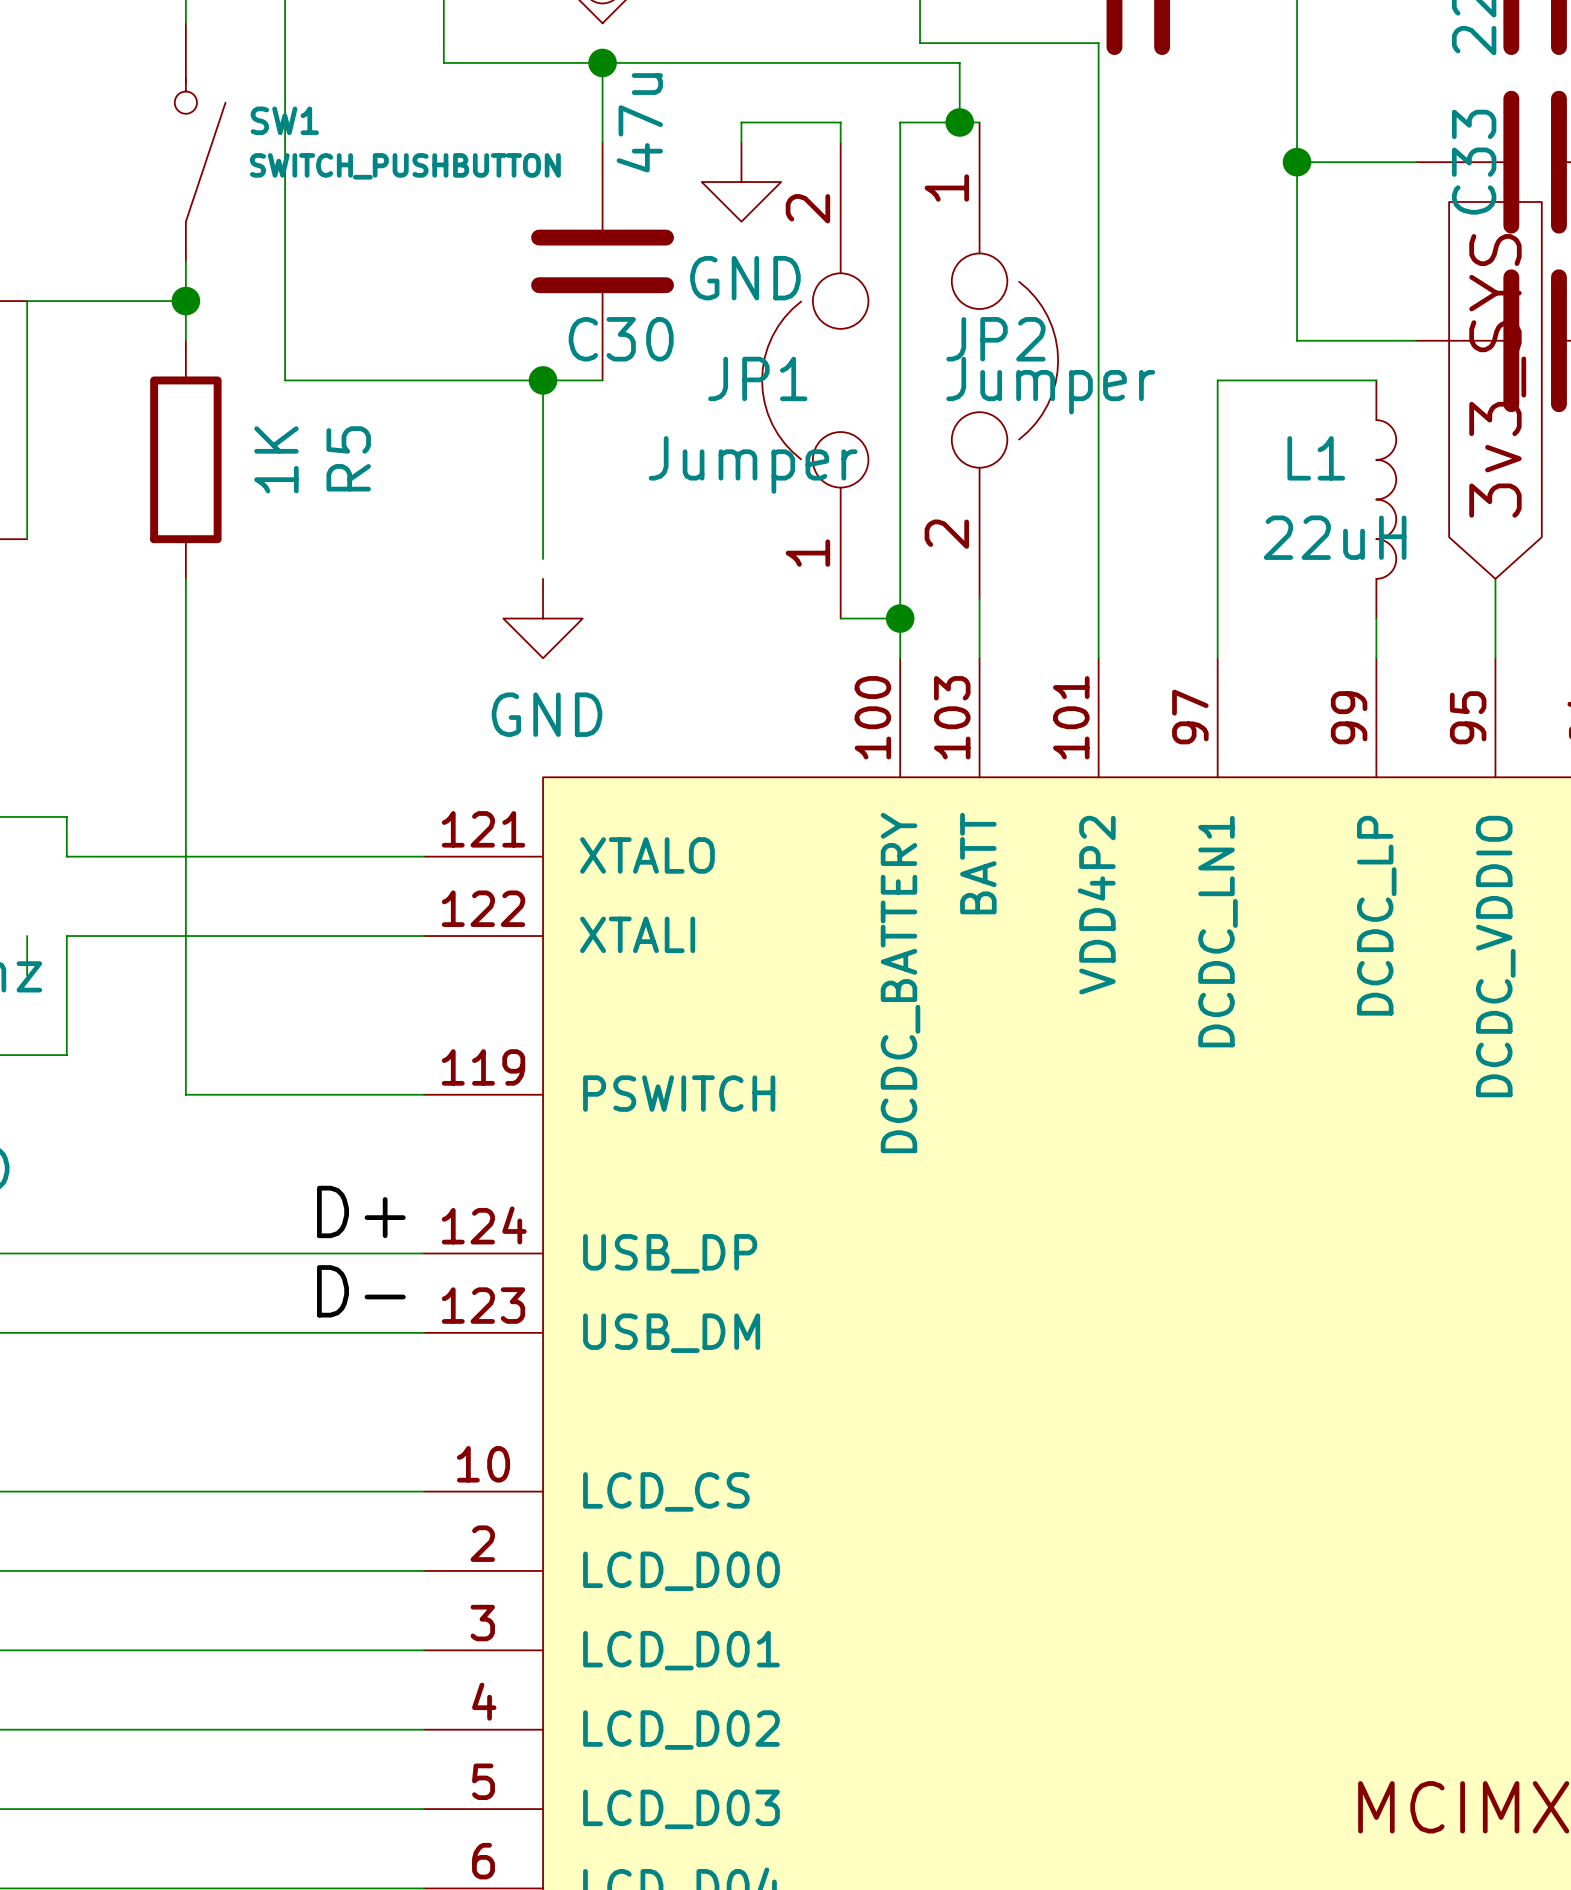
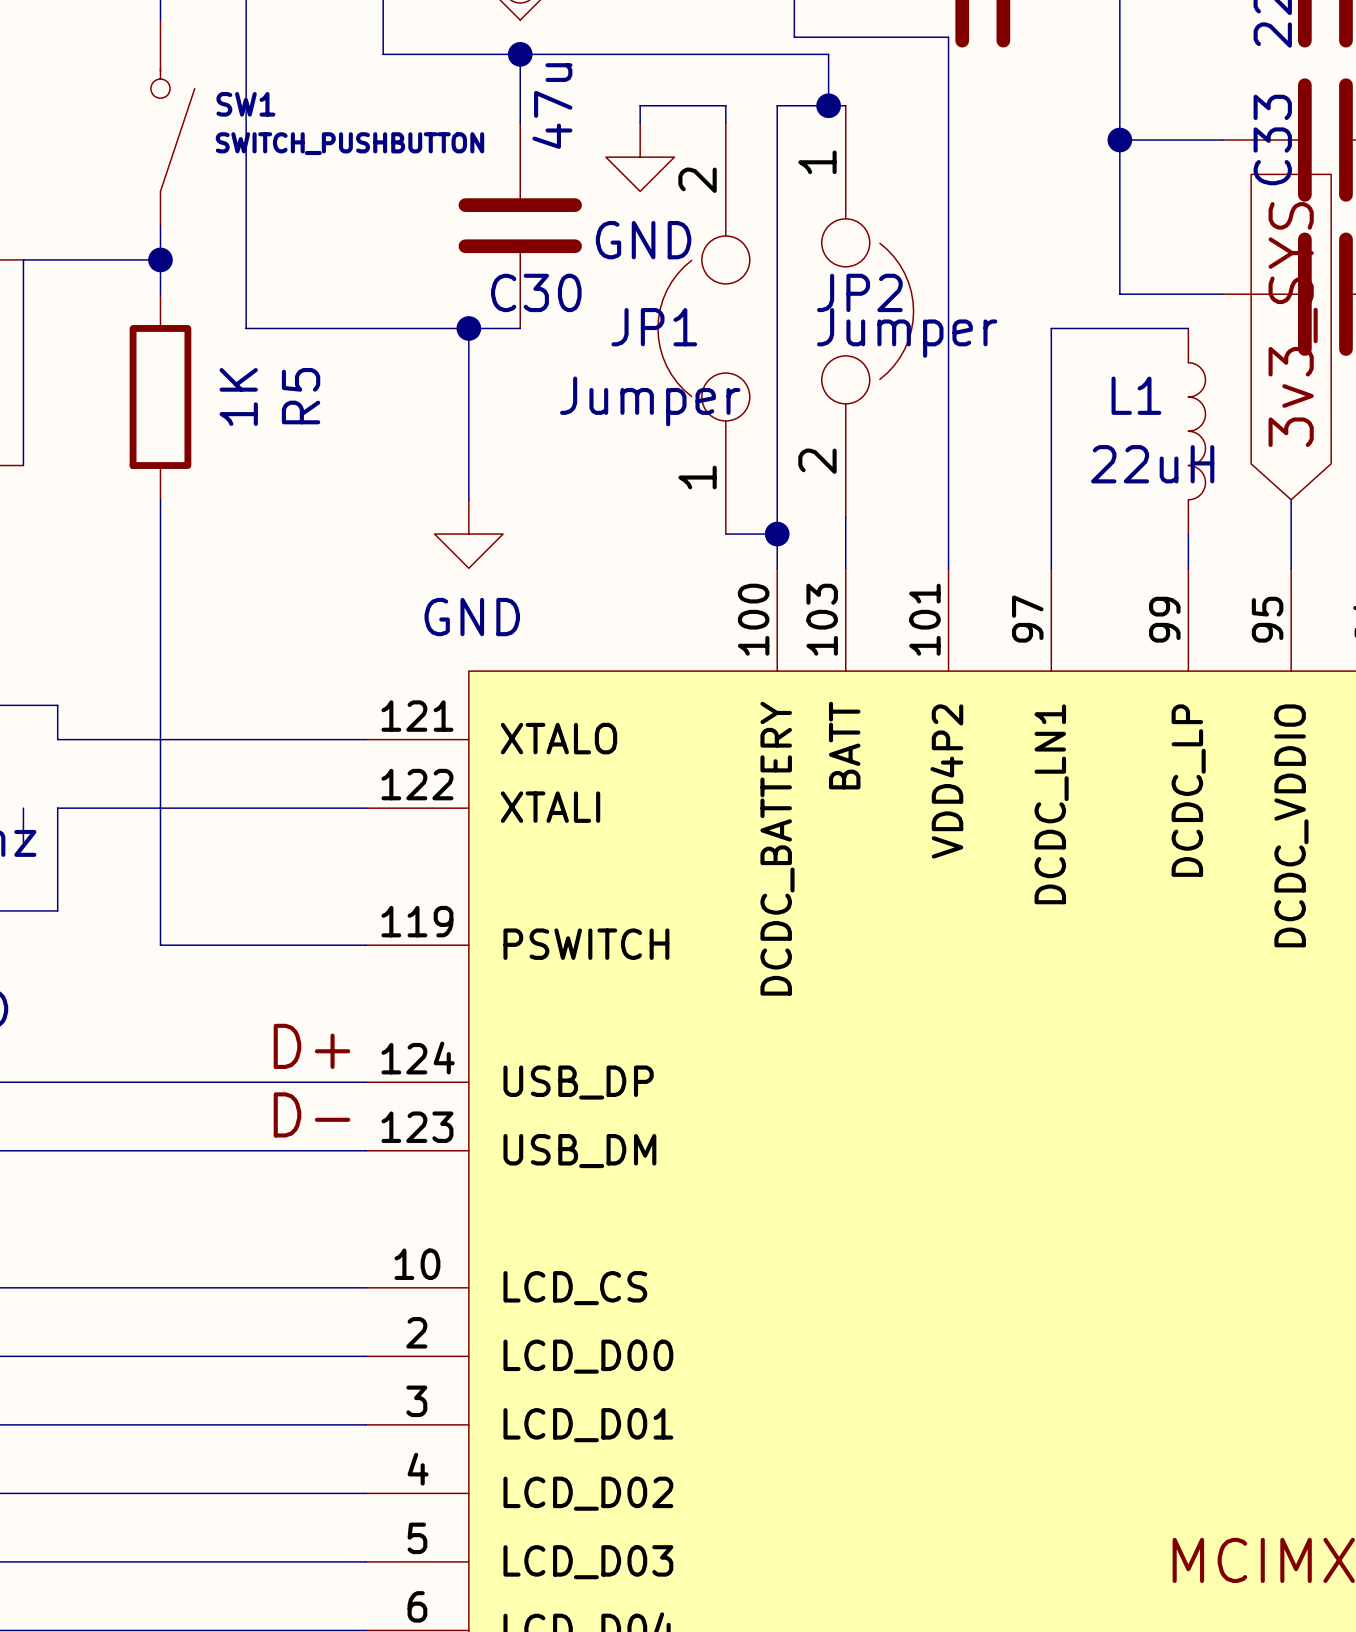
wire: none -> (468, 482) (468, 499)

